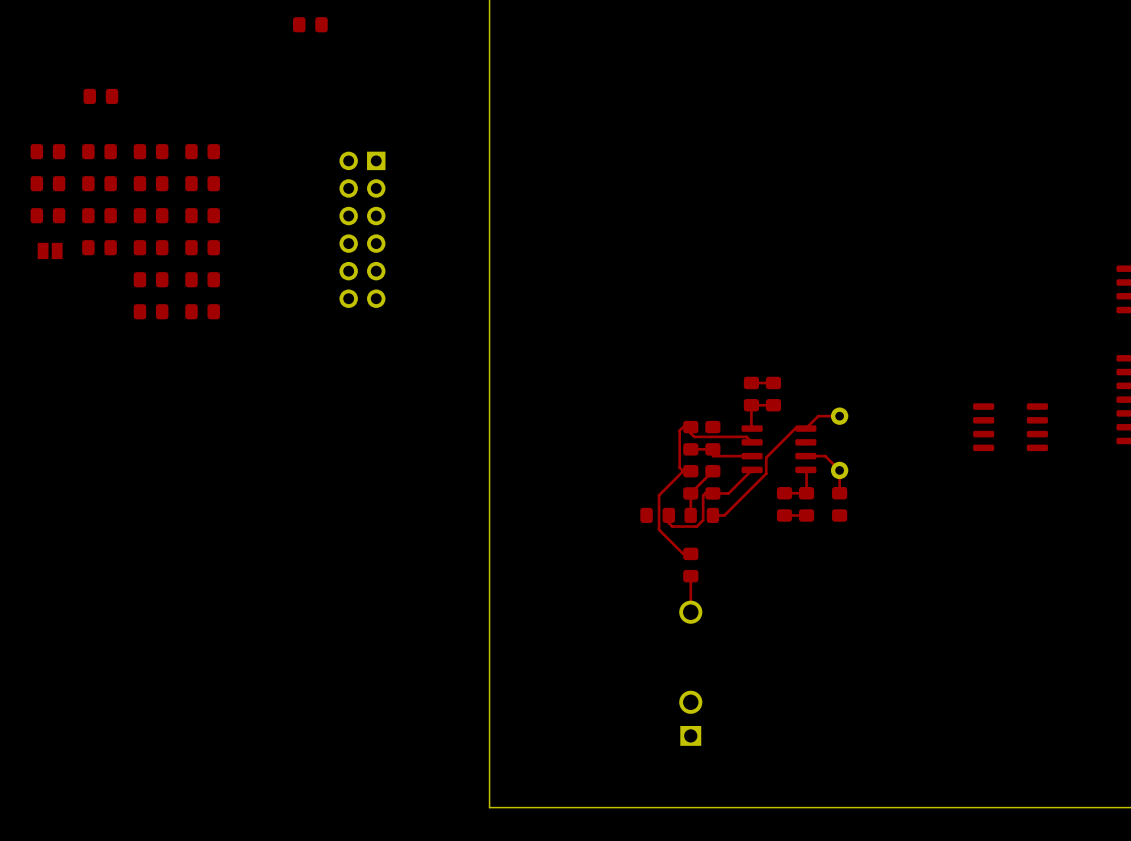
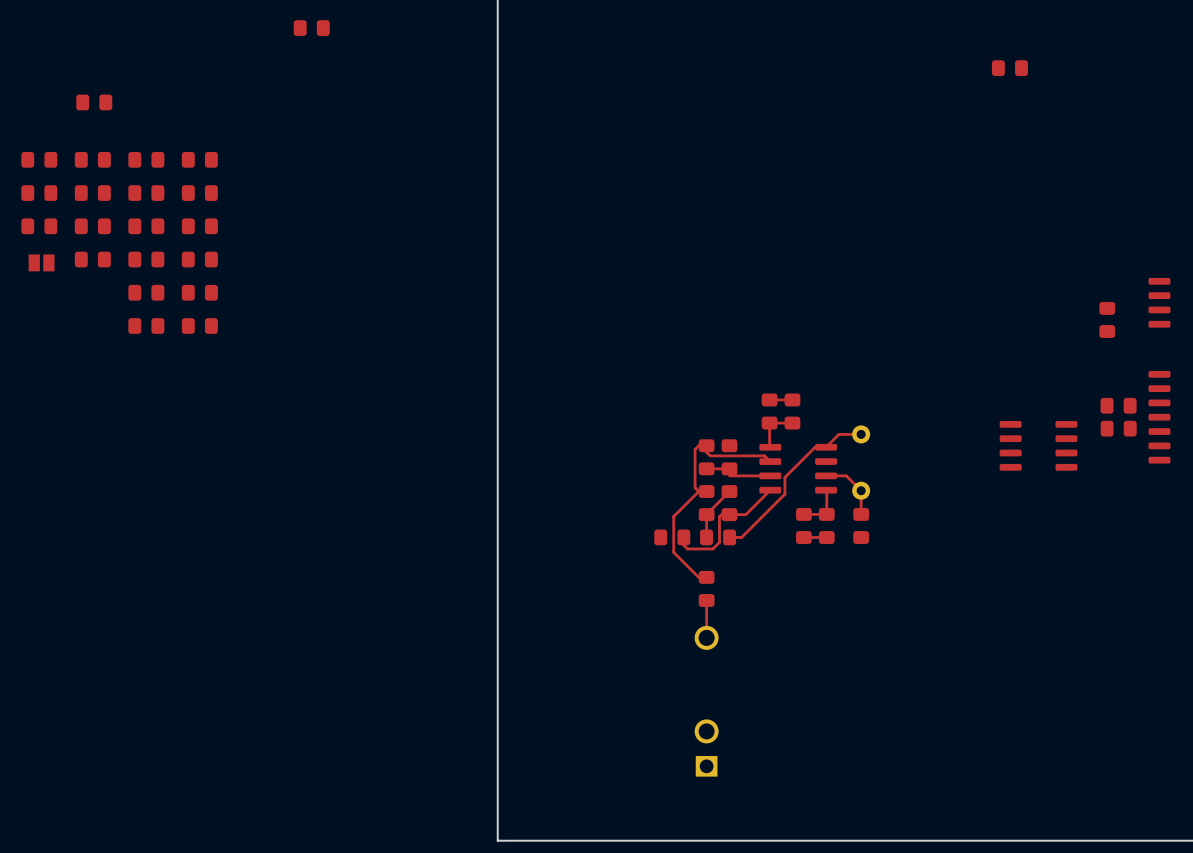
part: none -> (1009, 68)
part: (362, 229) -> none
part: none -> (1107, 319)
part: none -> (1118, 405)
part: none -> (1118, 428)

